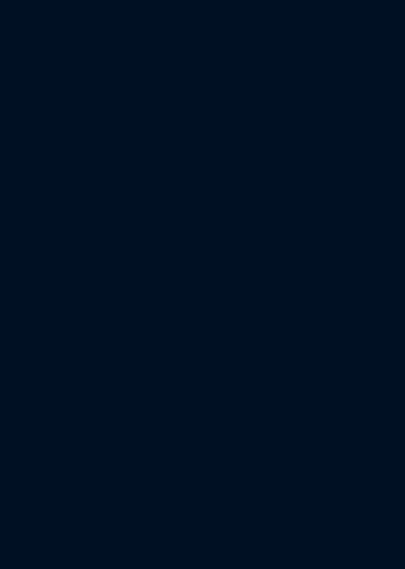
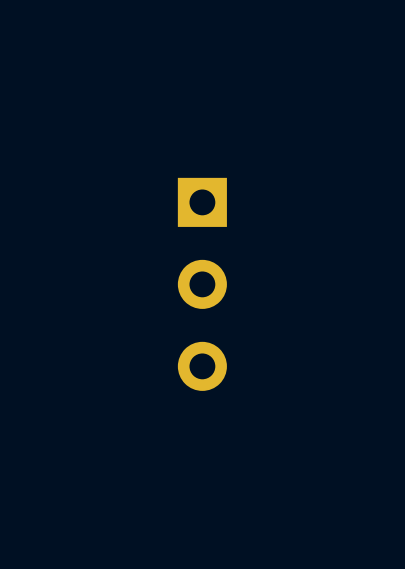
part: none -> (202, 284)

